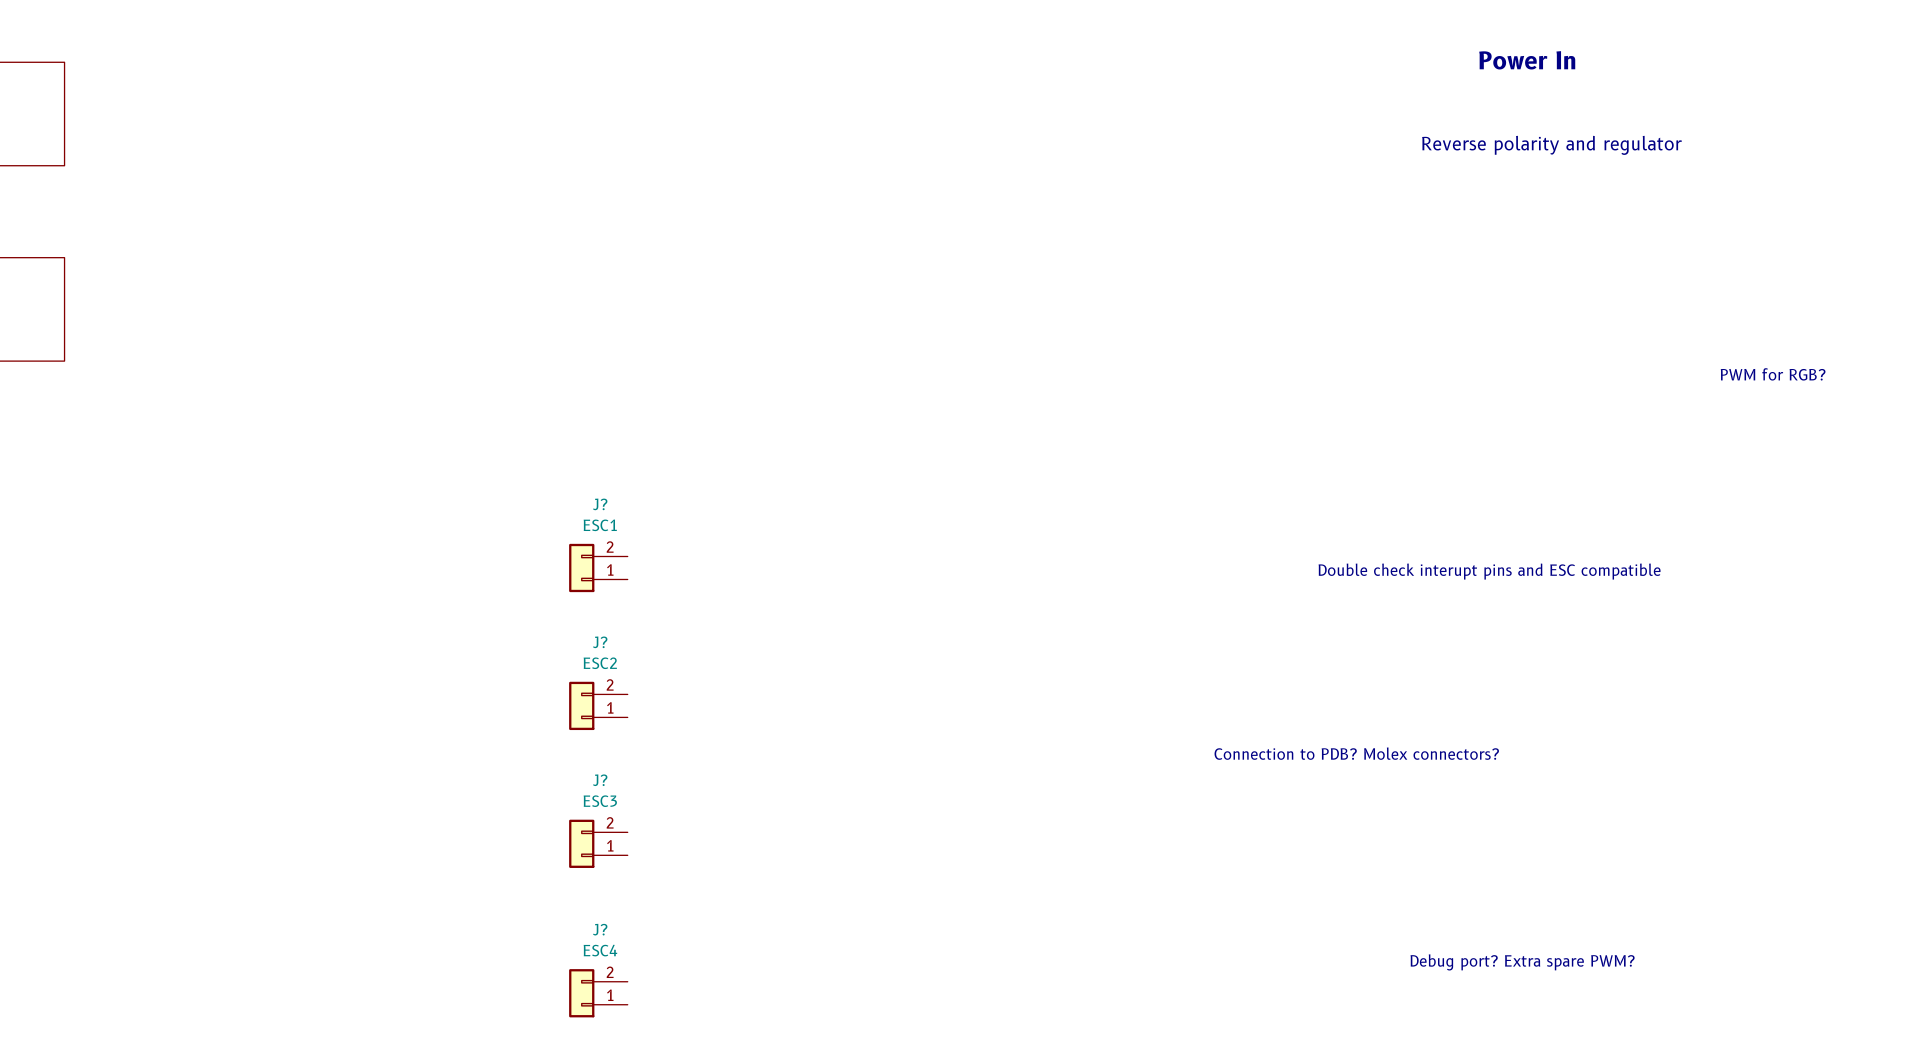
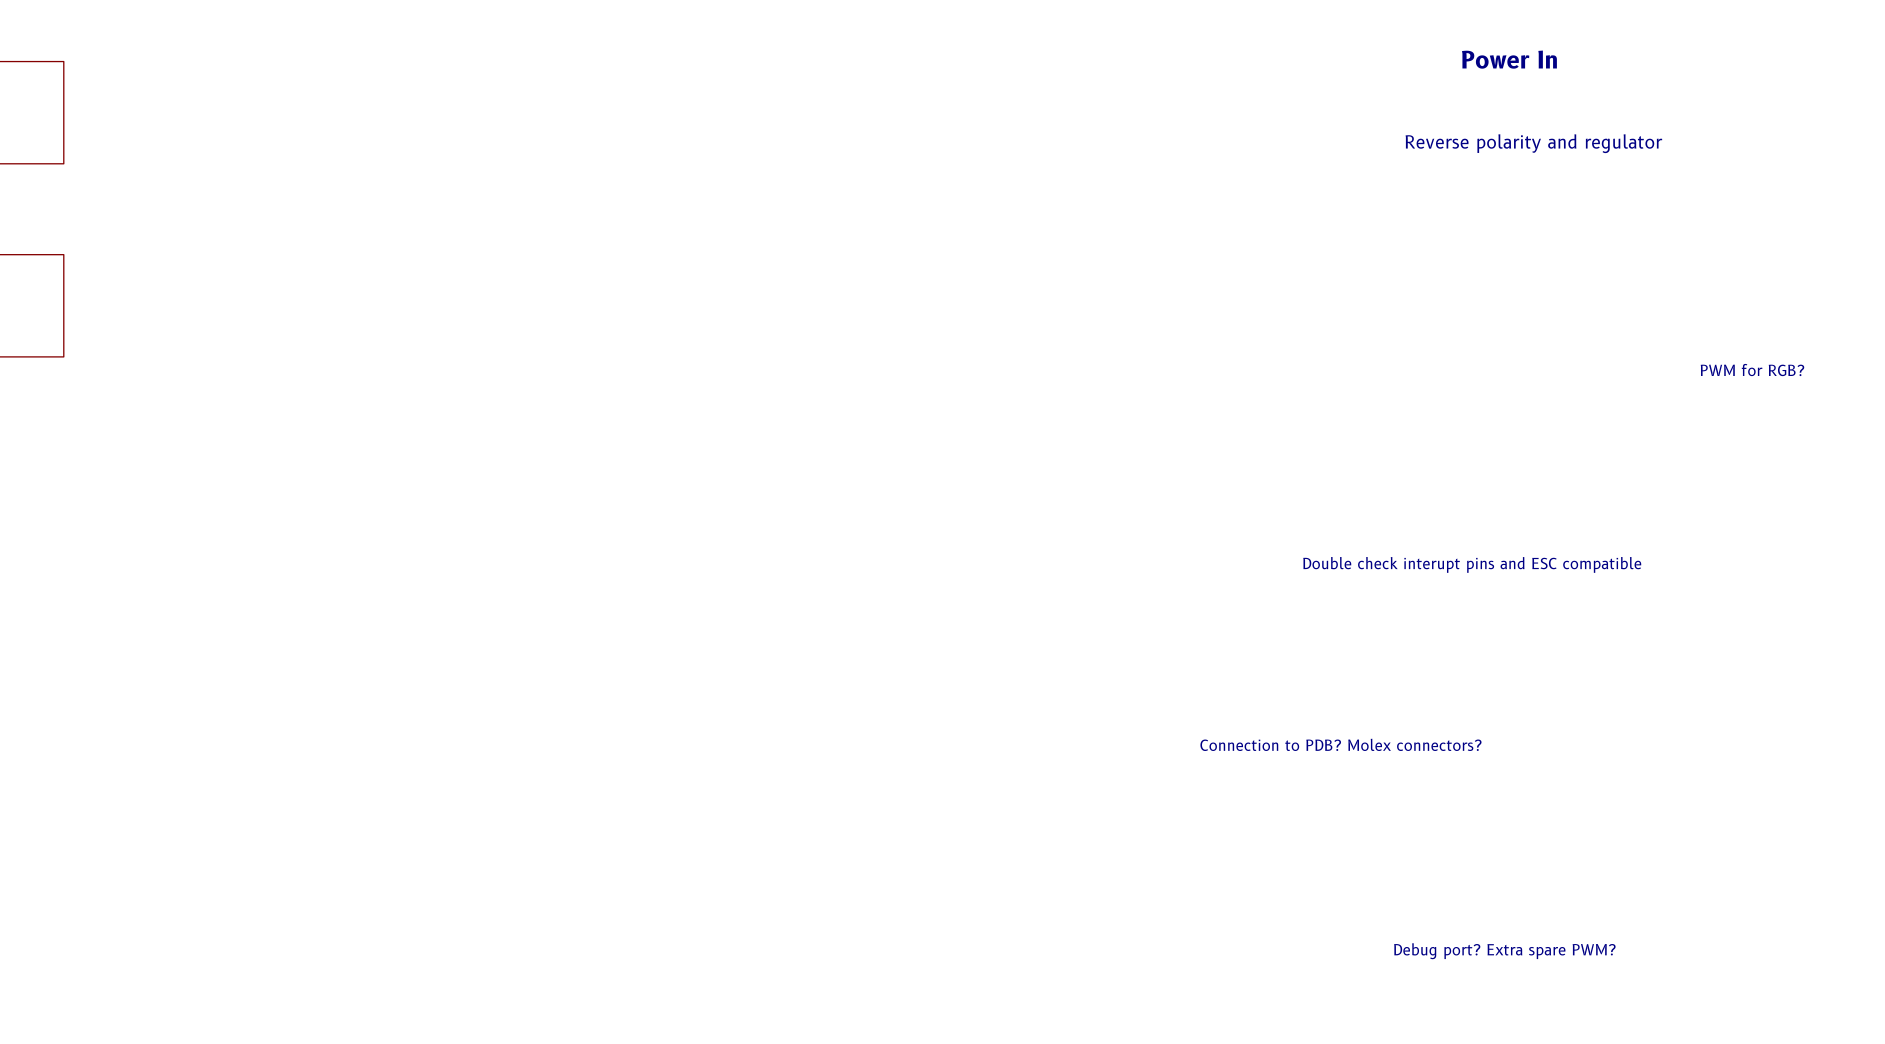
J?: ESC1 (598, 567) -> none
J?: ESC2 (598, 705) -> none
J?: ESC3 (598, 843) -> none
J?: ESC4 (598, 993) -> none

